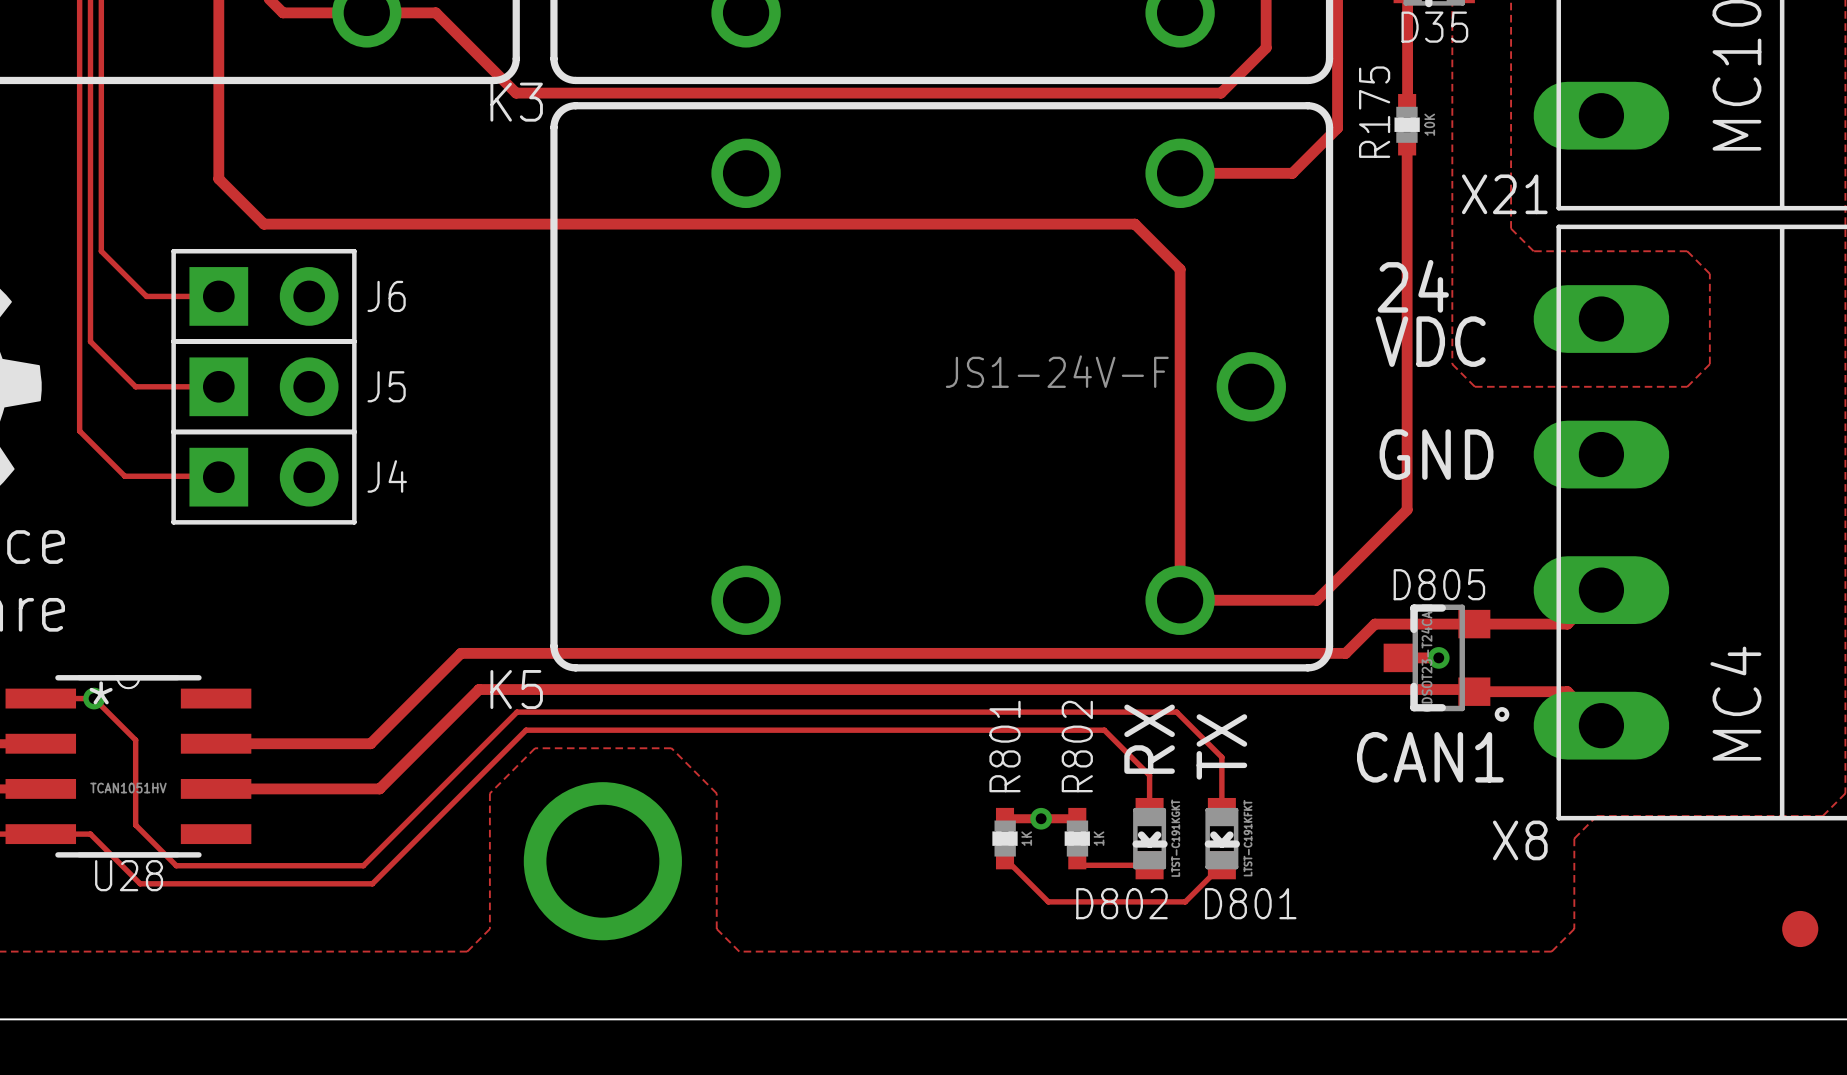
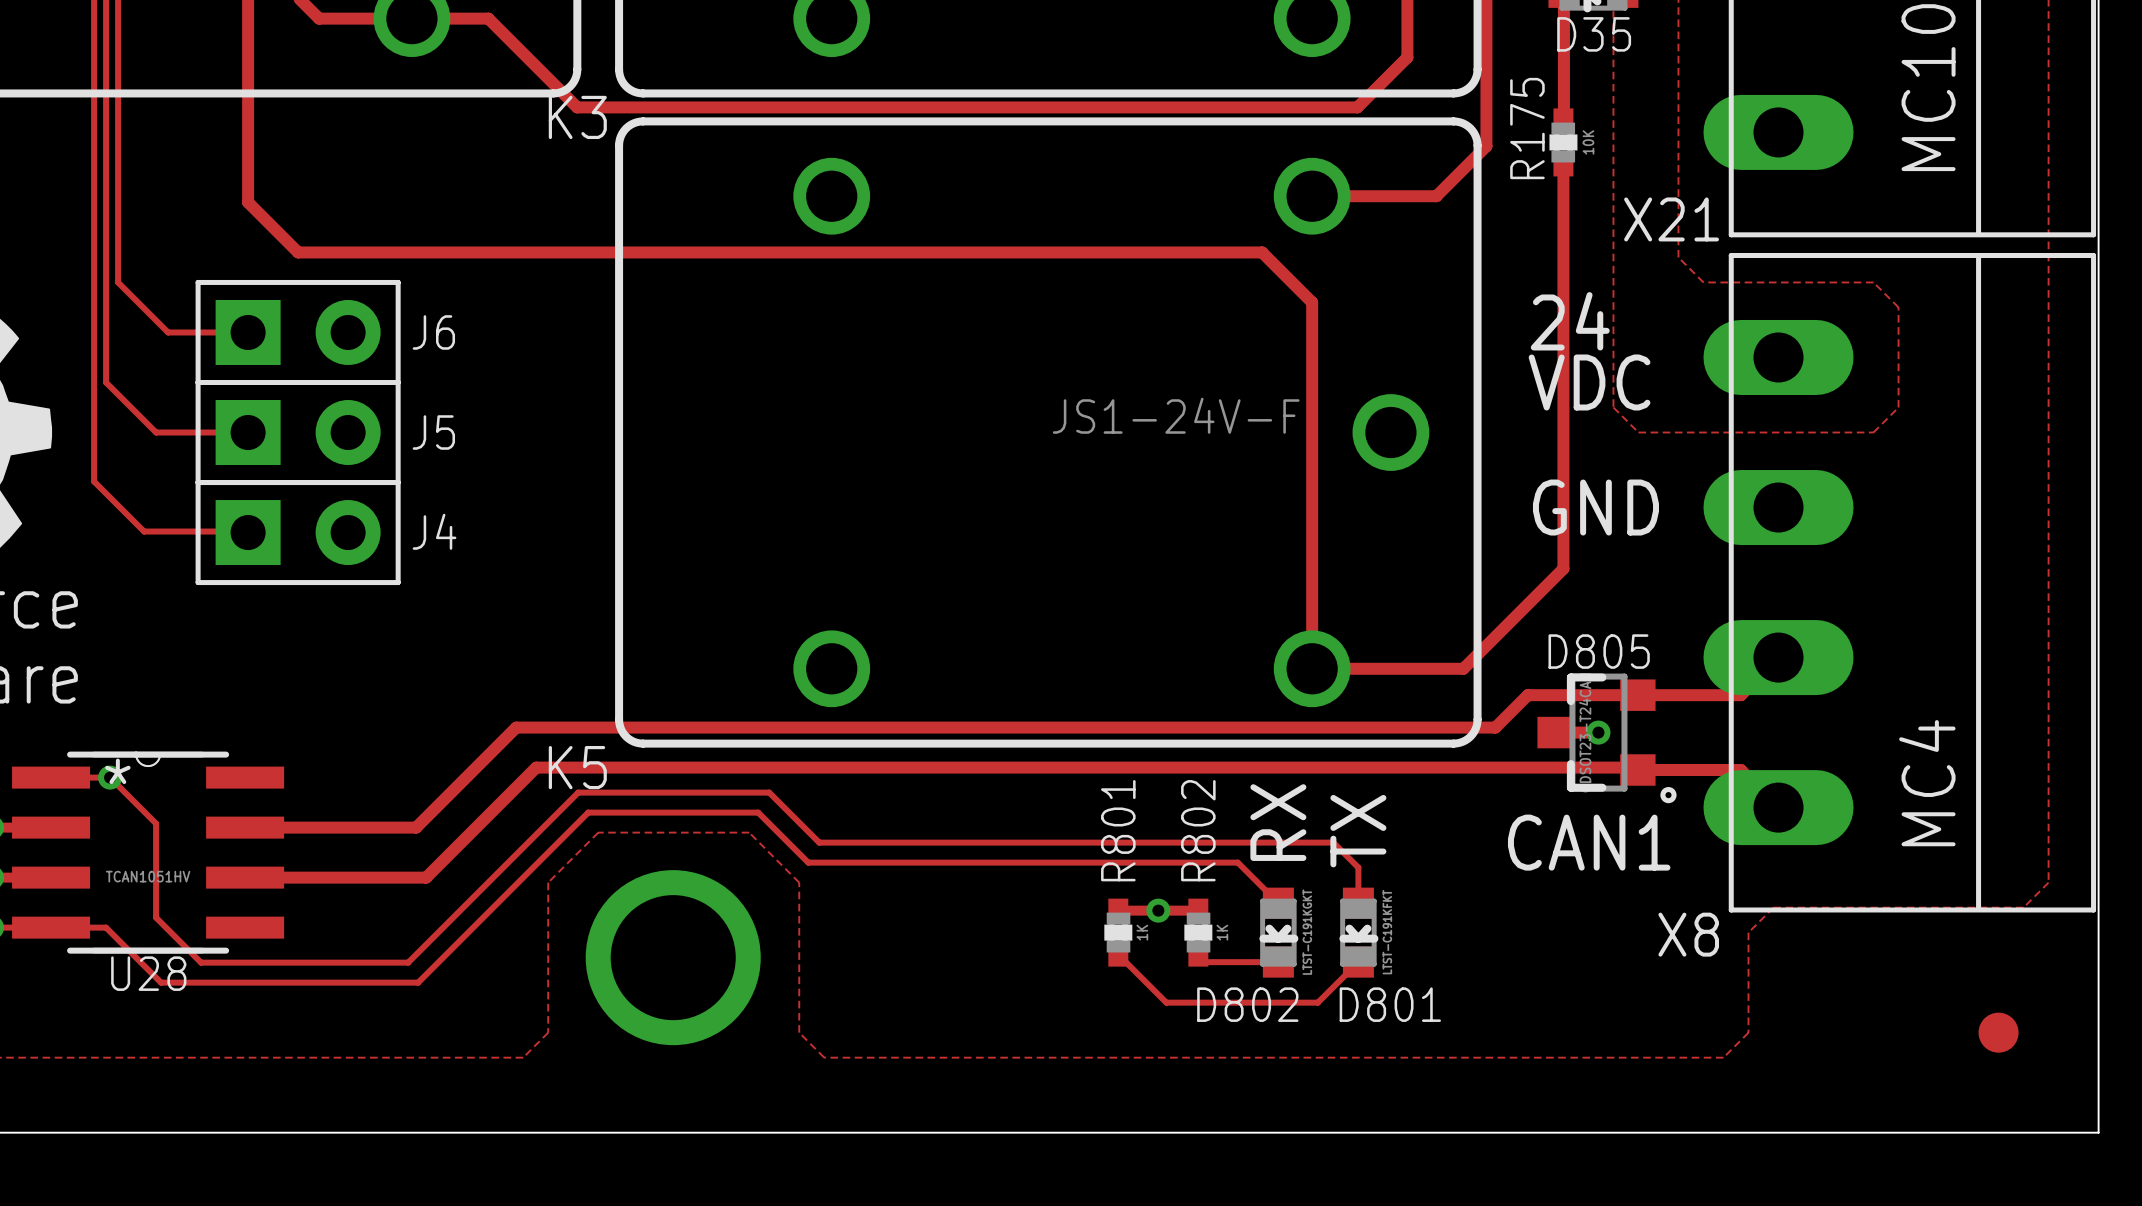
track: (689, 712) (1176, 712) (1221, 757) (1221, 779) -> (769, 792) (819, 842) (1333, 842) (1358, 867)
track: (679, 730) (1104, 730) (1149, 775) (1149, 811) -> (758, 812) (808, 862) (1237, 862) (1278, 903)

